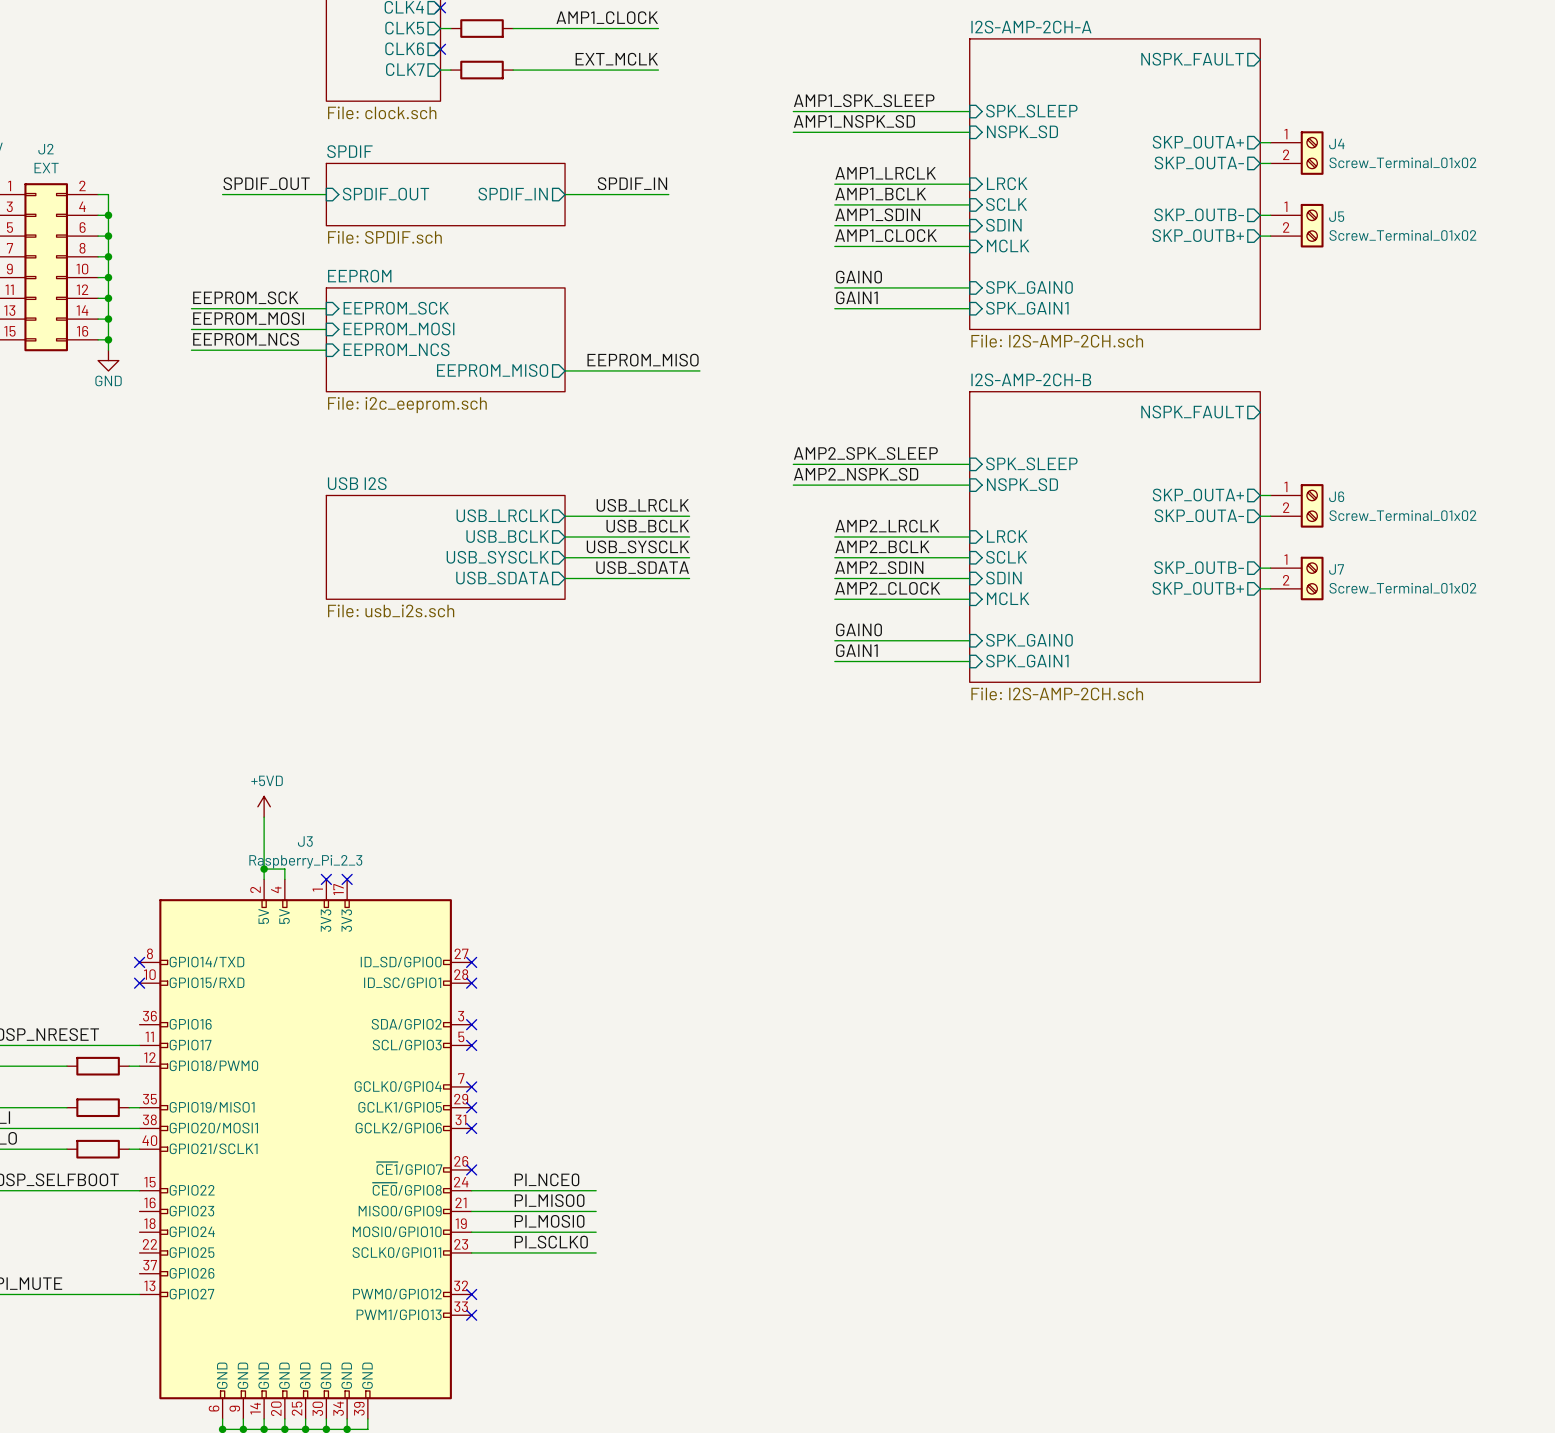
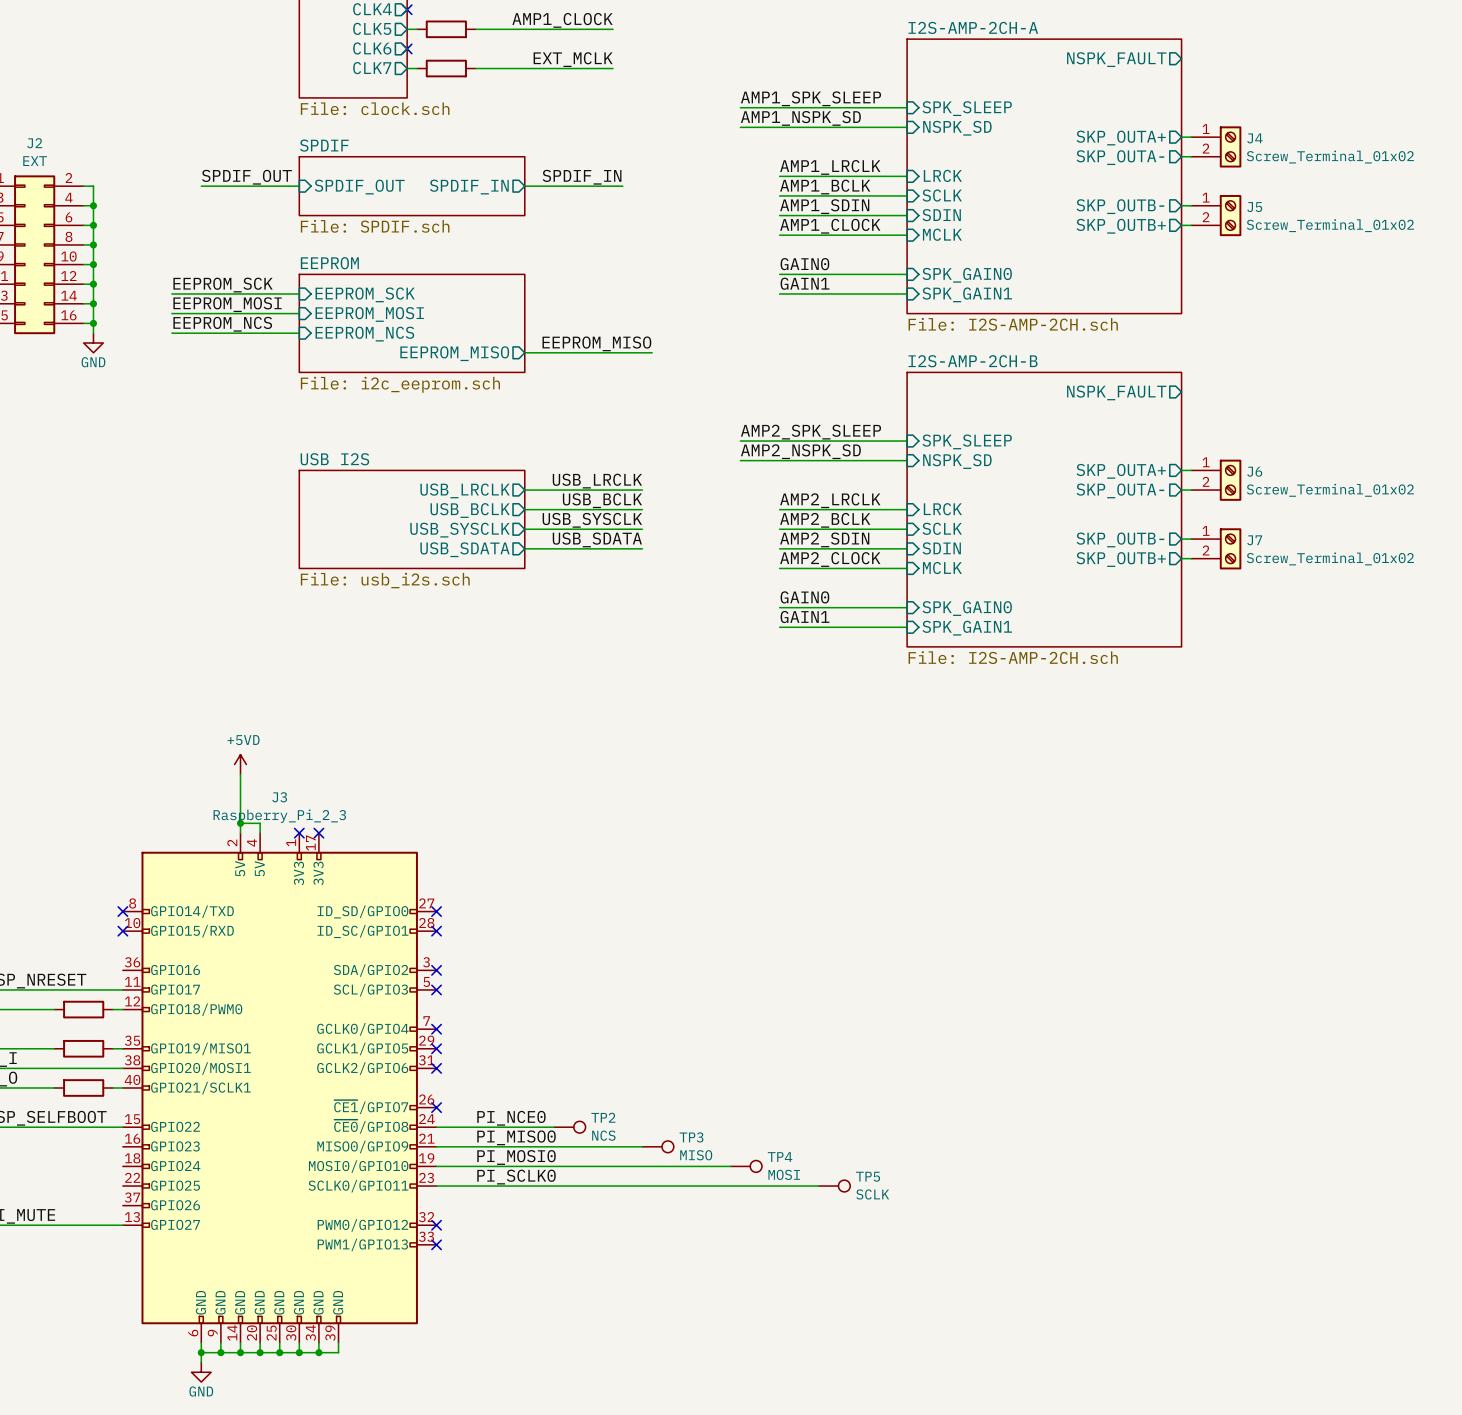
TP2: none -> NCS (569, 1127)
wire: none -> (554, 1146) (642, 1146)
TP3: none -> MISO (658, 1146)
wire: none -> (554, 1166) (730, 1166)
TP4: none -> MOSI (746, 1166)
wire: none -> (554, 1186) (818, 1186)
TP5: none -> SCLK (834, 1186)

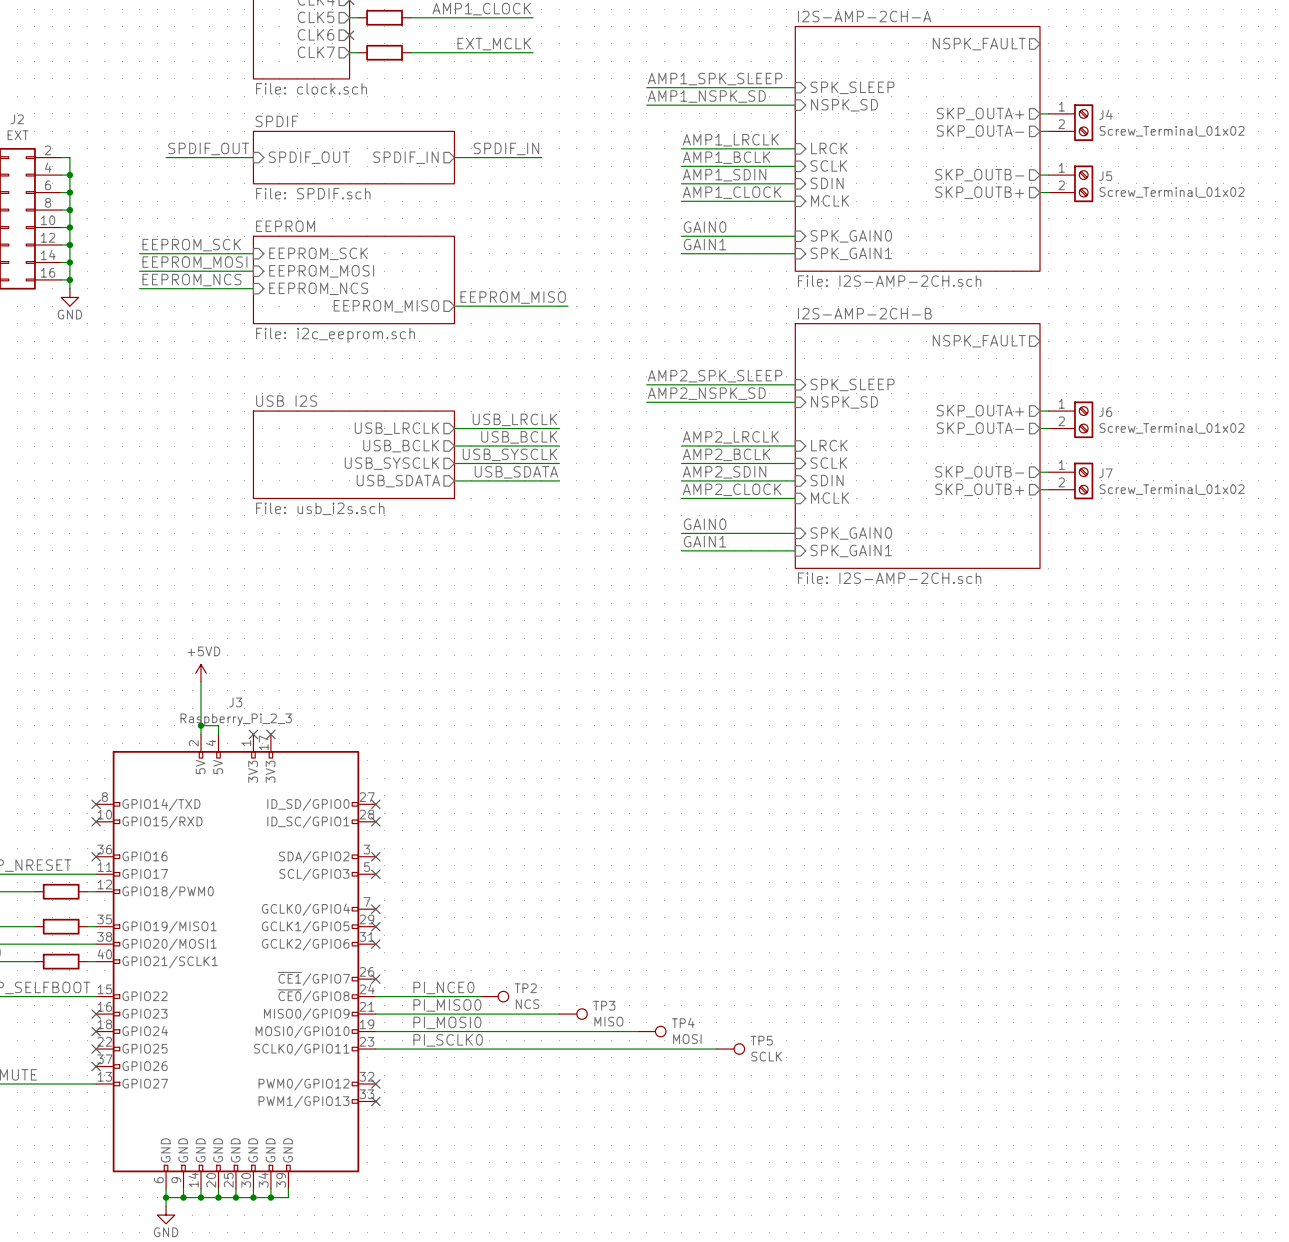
no-connect mark: none -> (96, 856)
no-connect mark: none -> (96, 1014)
no-connect mark: none -> (96, 1031)
no-connect mark: none -> (96, 1049)
no-connect mark: none -> (96, 1066)

